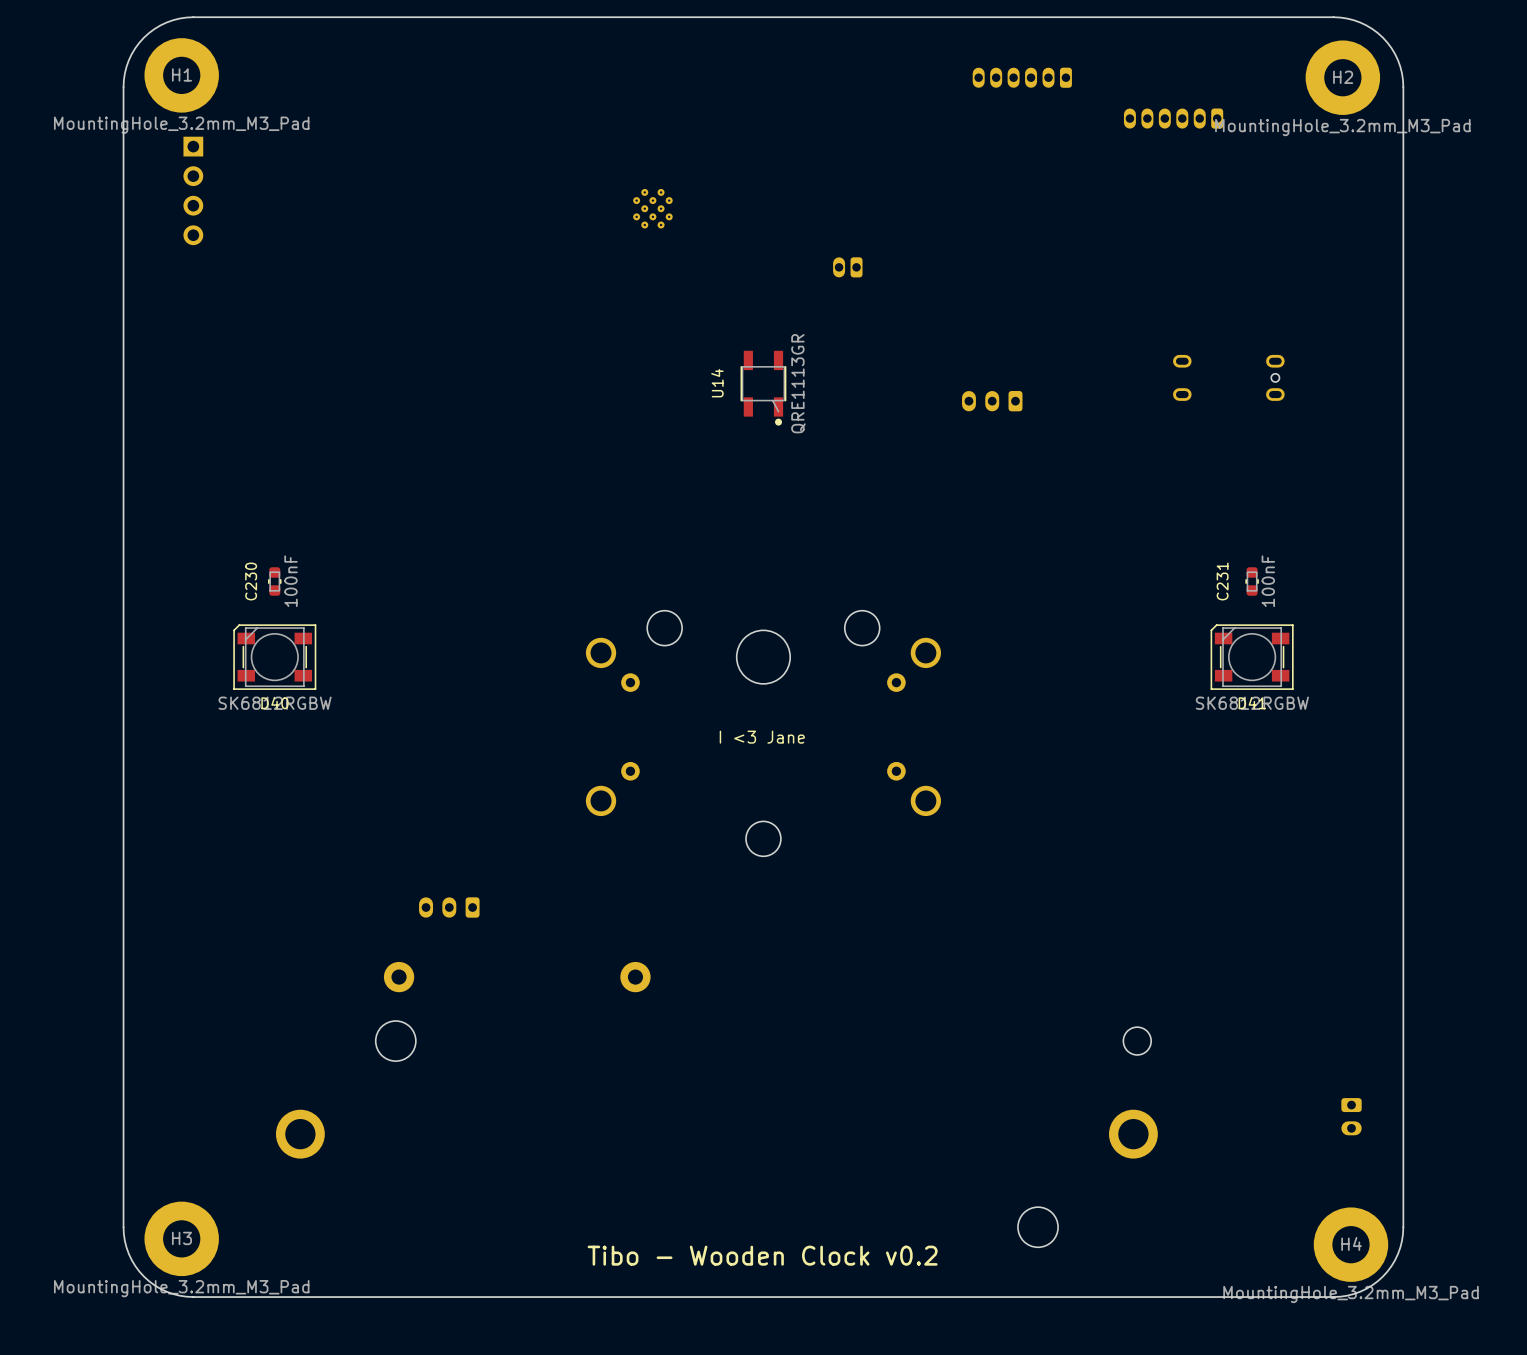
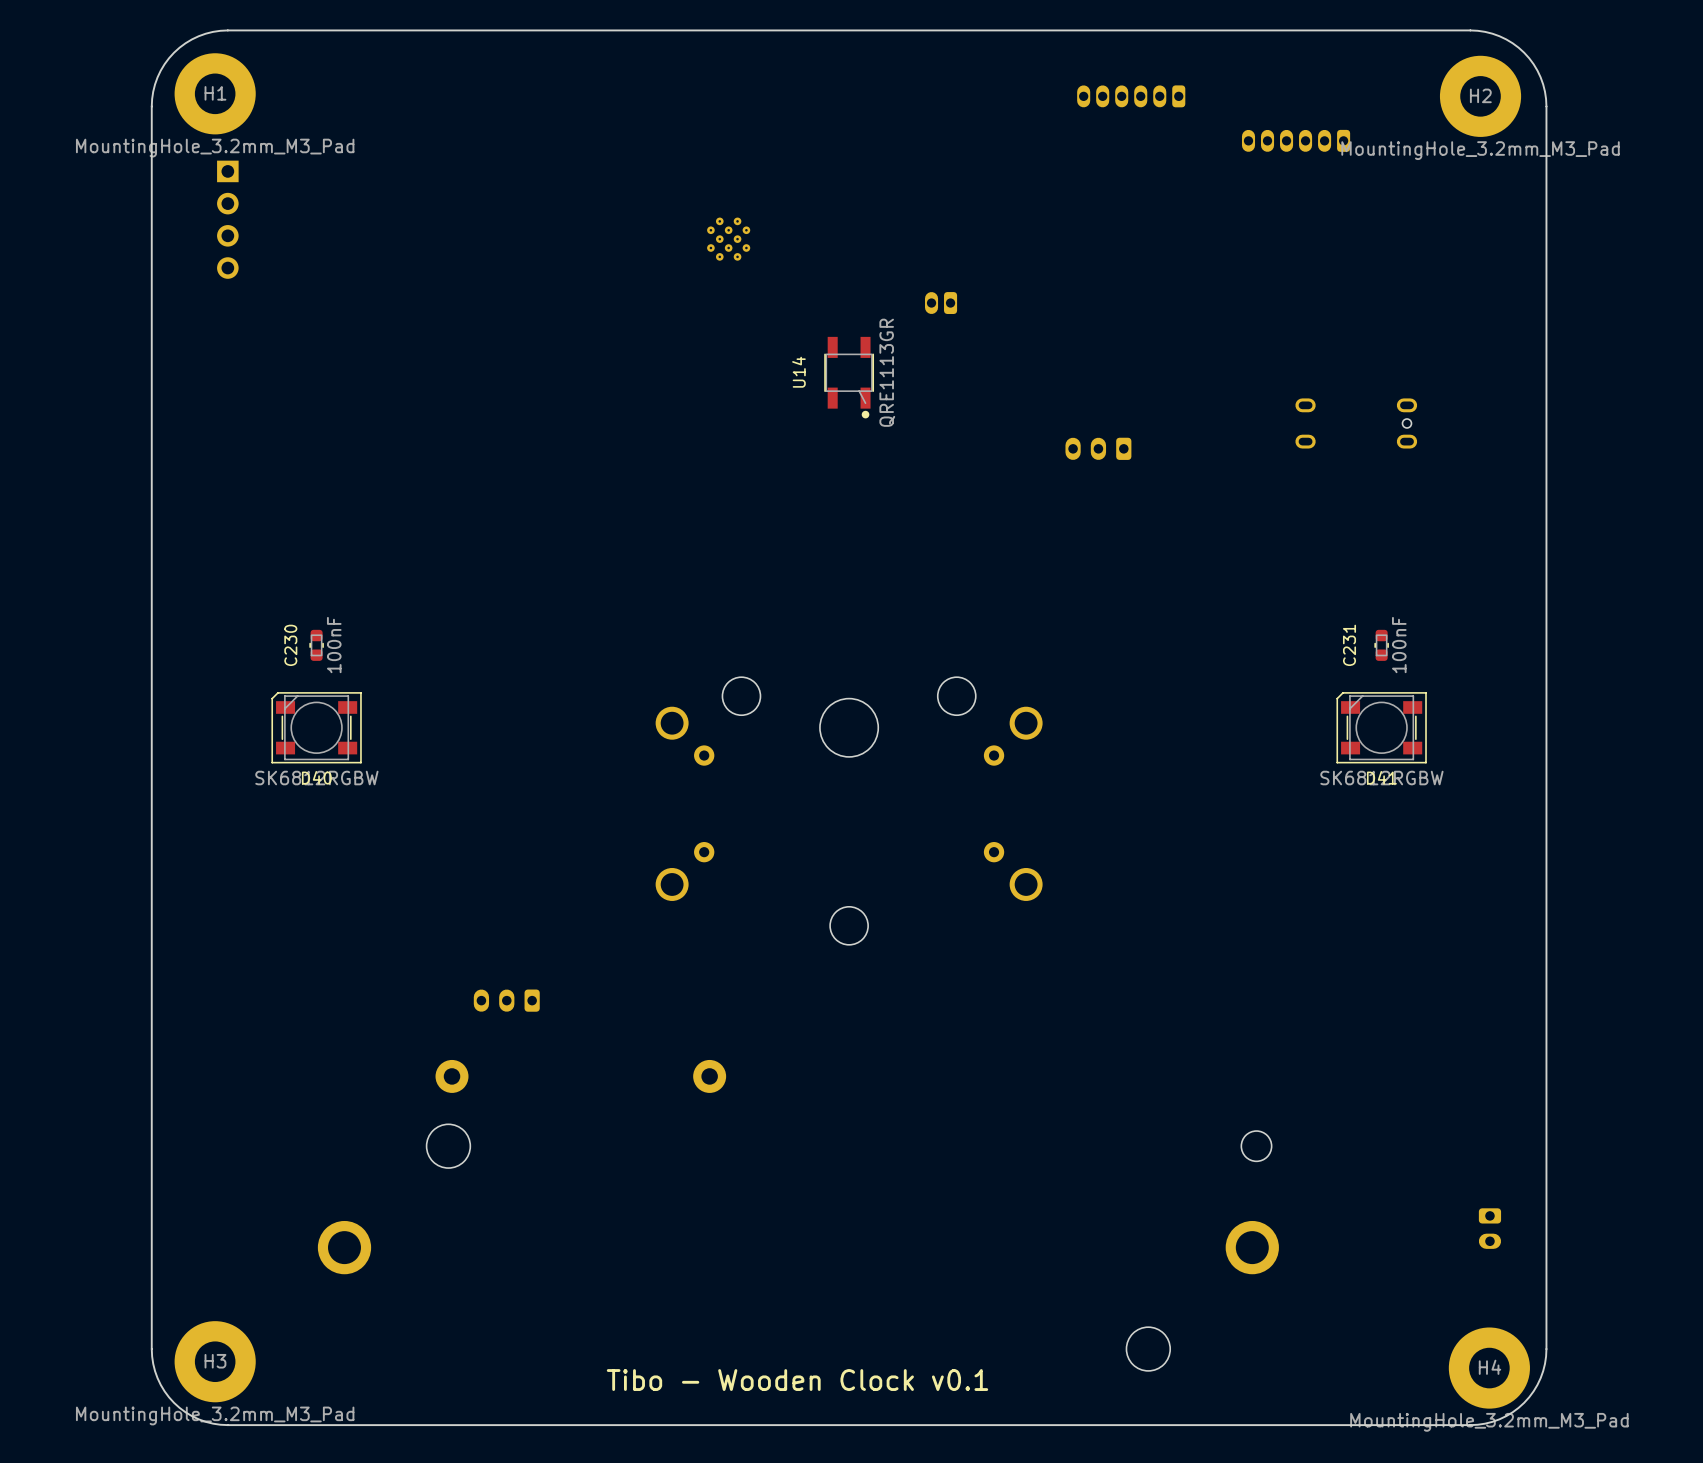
U14 position: (763, 388) -> (849, 377)
text: I <3 Jane (762, 737) -> none
text: Tibo - Wooden Clock v0.2 (762, 1255) -> Tibo - Wooden Clock v0.1 (797, 1380)

